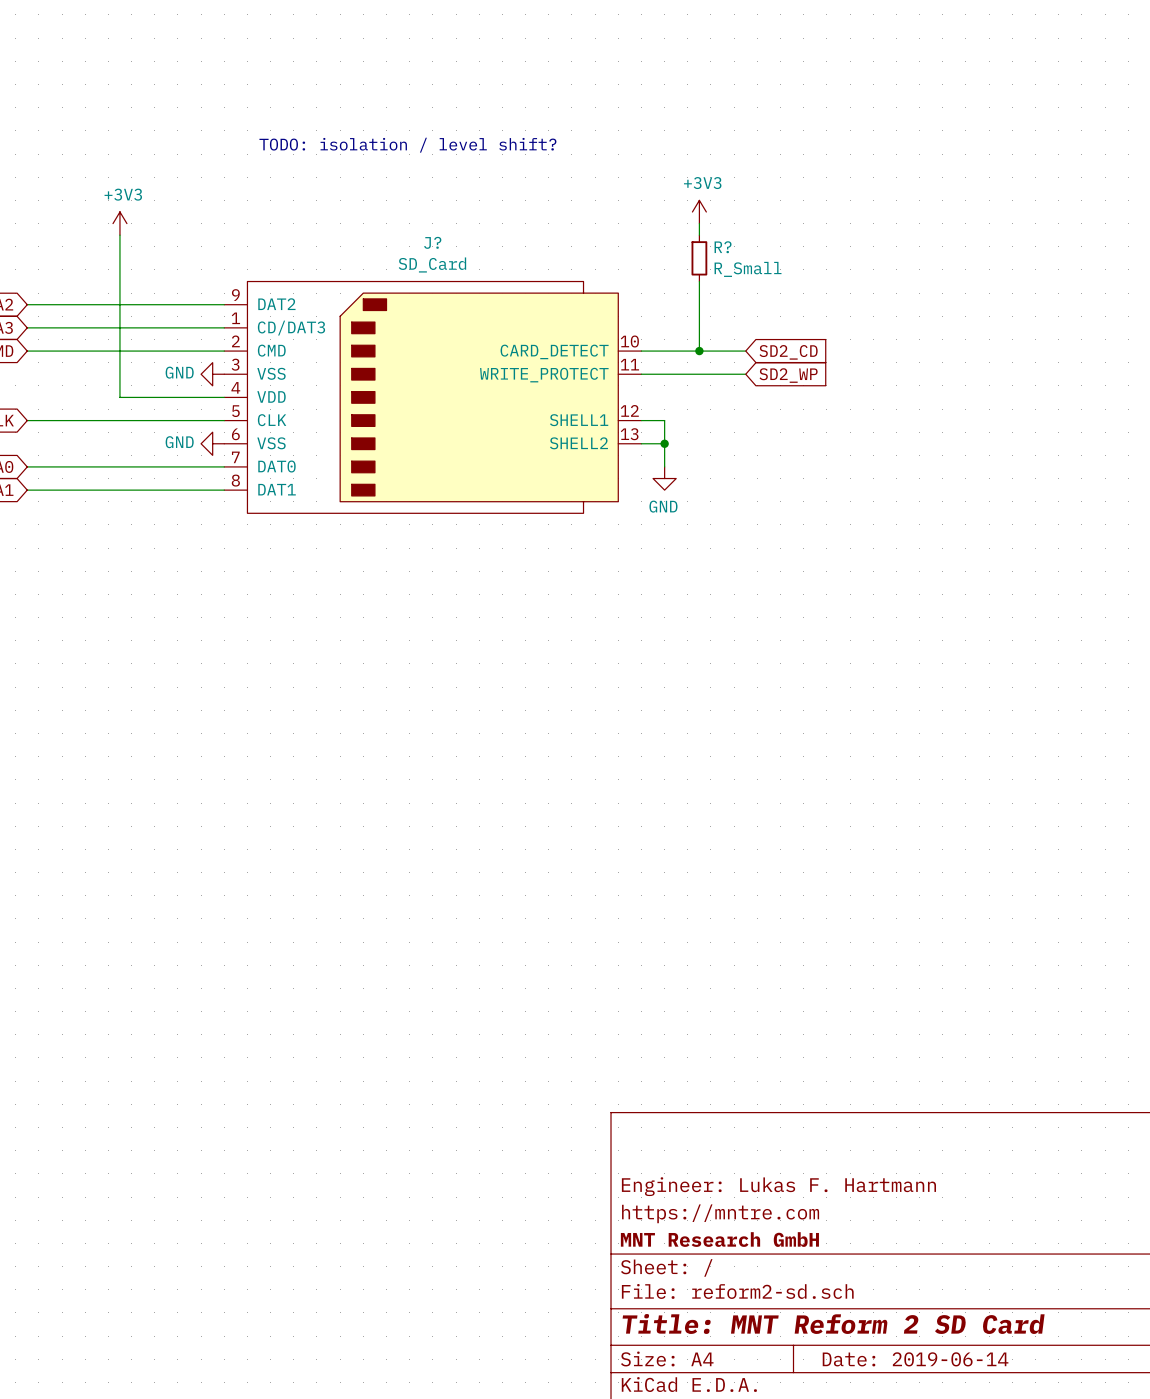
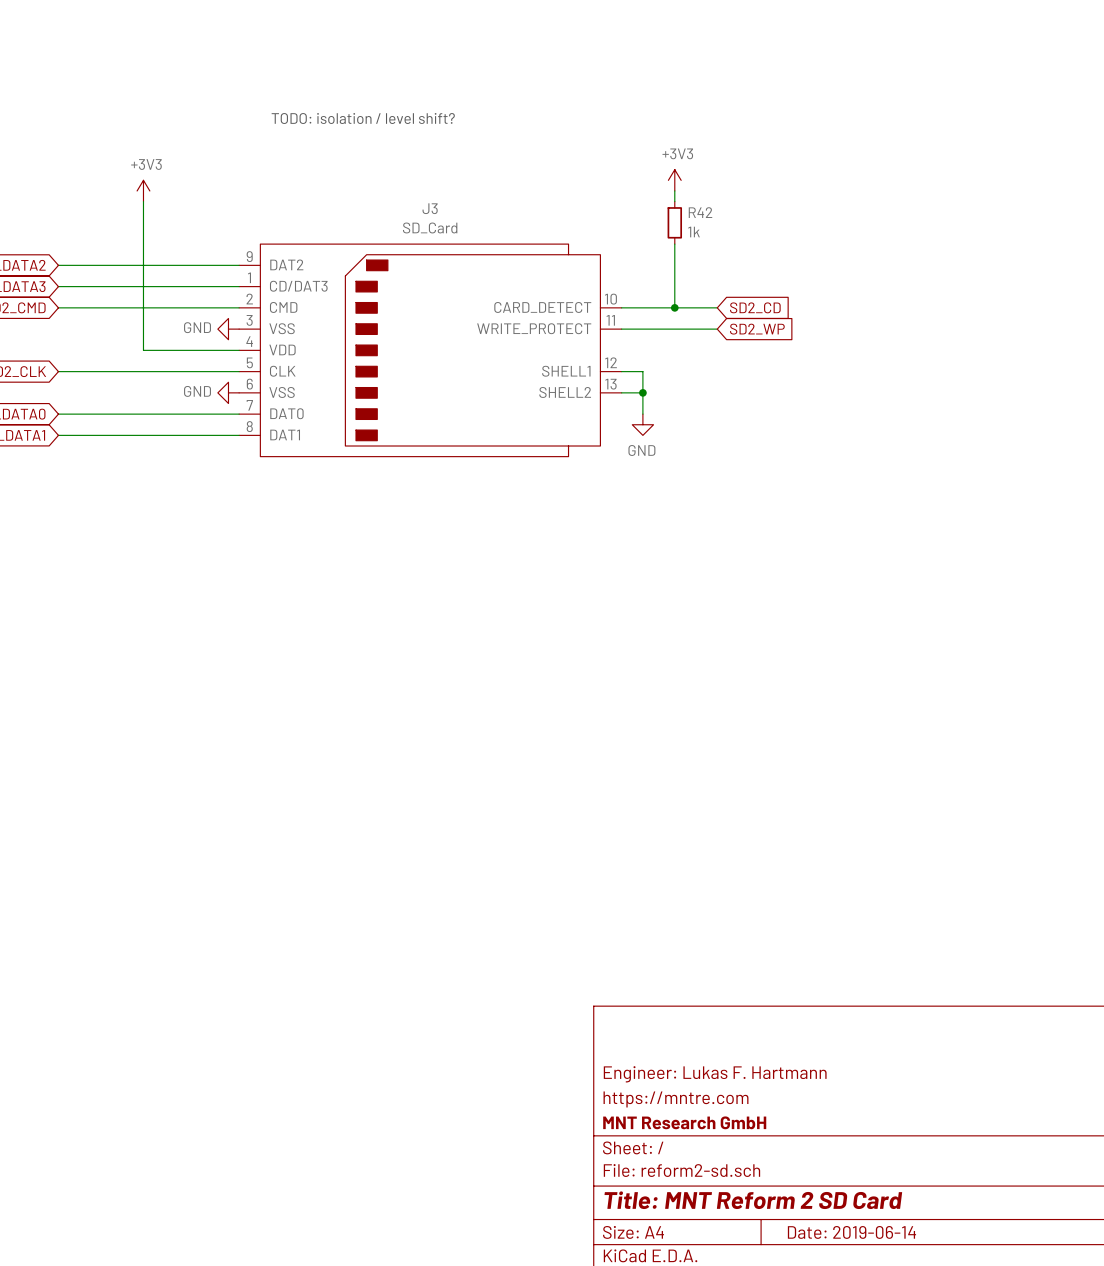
J? name: J? (432, 242) -> J3 (430, 208)
R? name: R? (723, 247) -> R42 (700, 212)
R? value: R_Small (748, 269) -> 1k (694, 232)

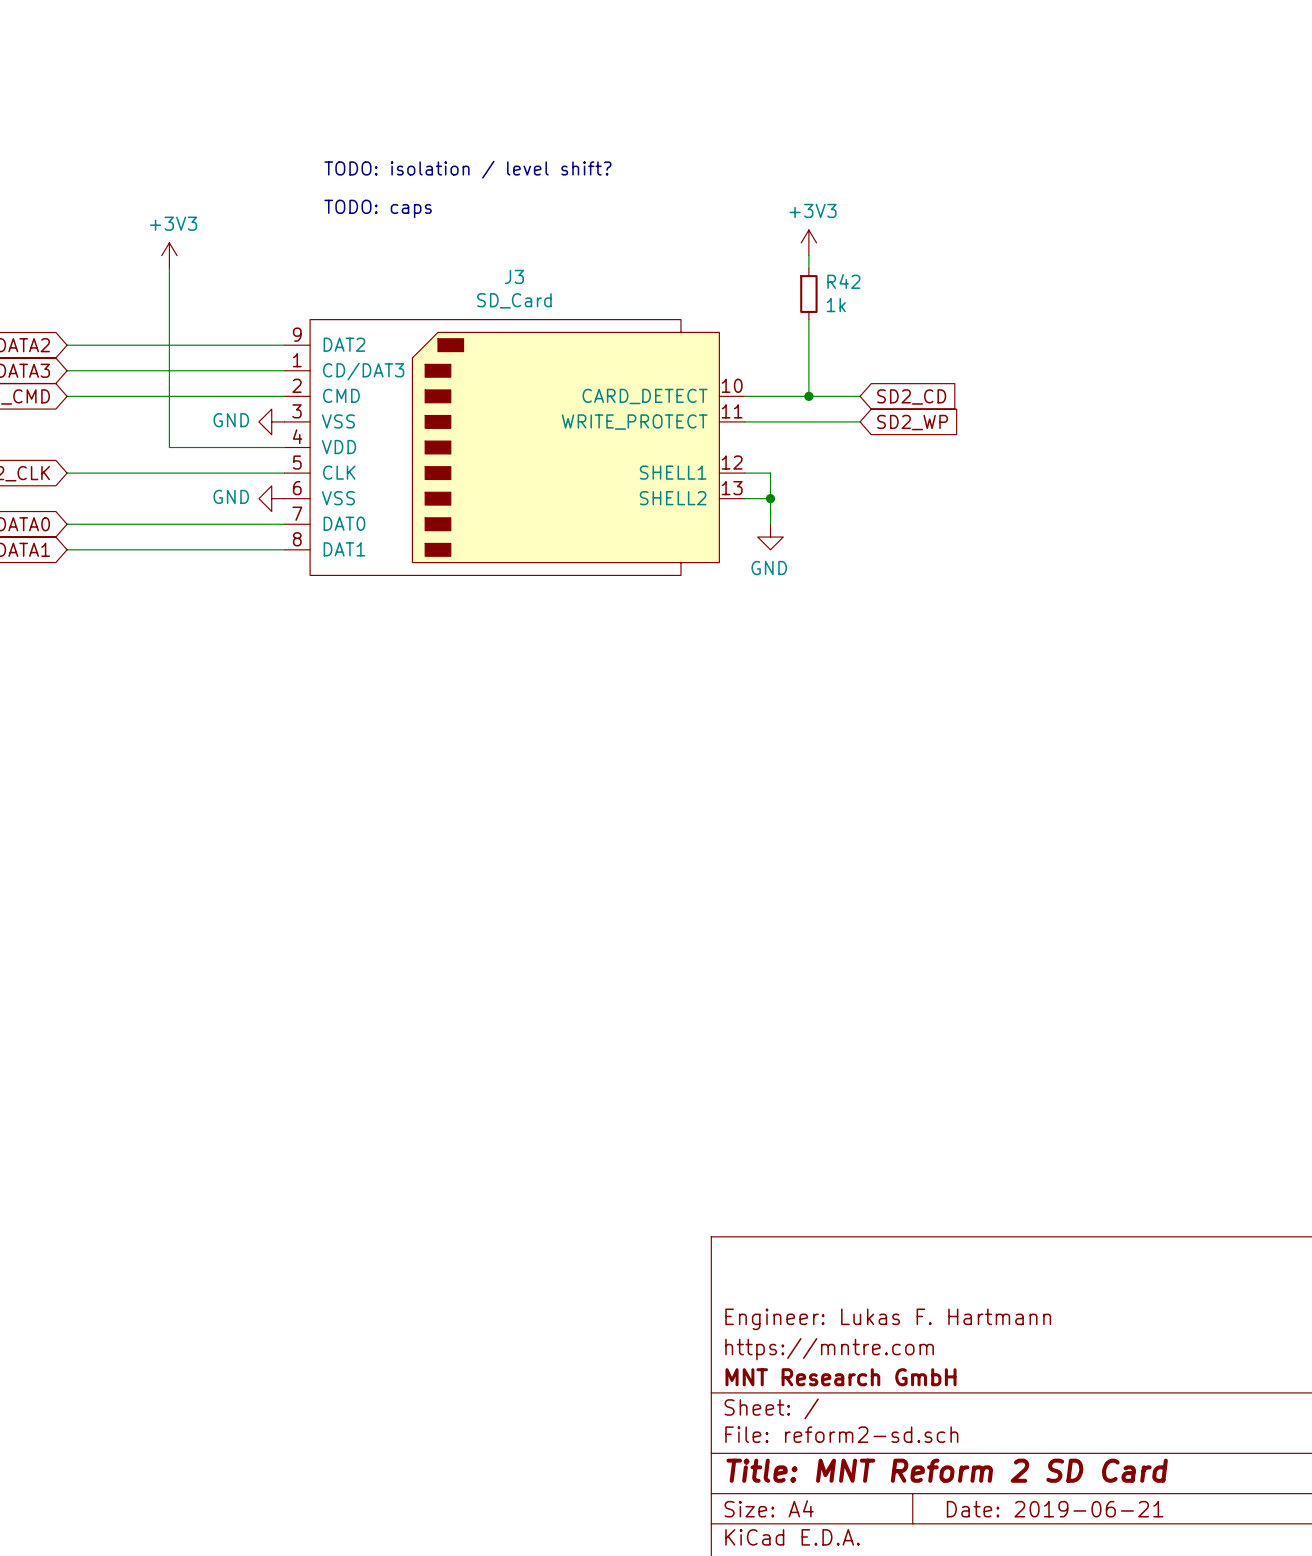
text: none -> TODO: caps (378, 208)
title block: Date: 2019-06-14 (851, 1232) -> Date: 2019-06-21 (1055, 1509)

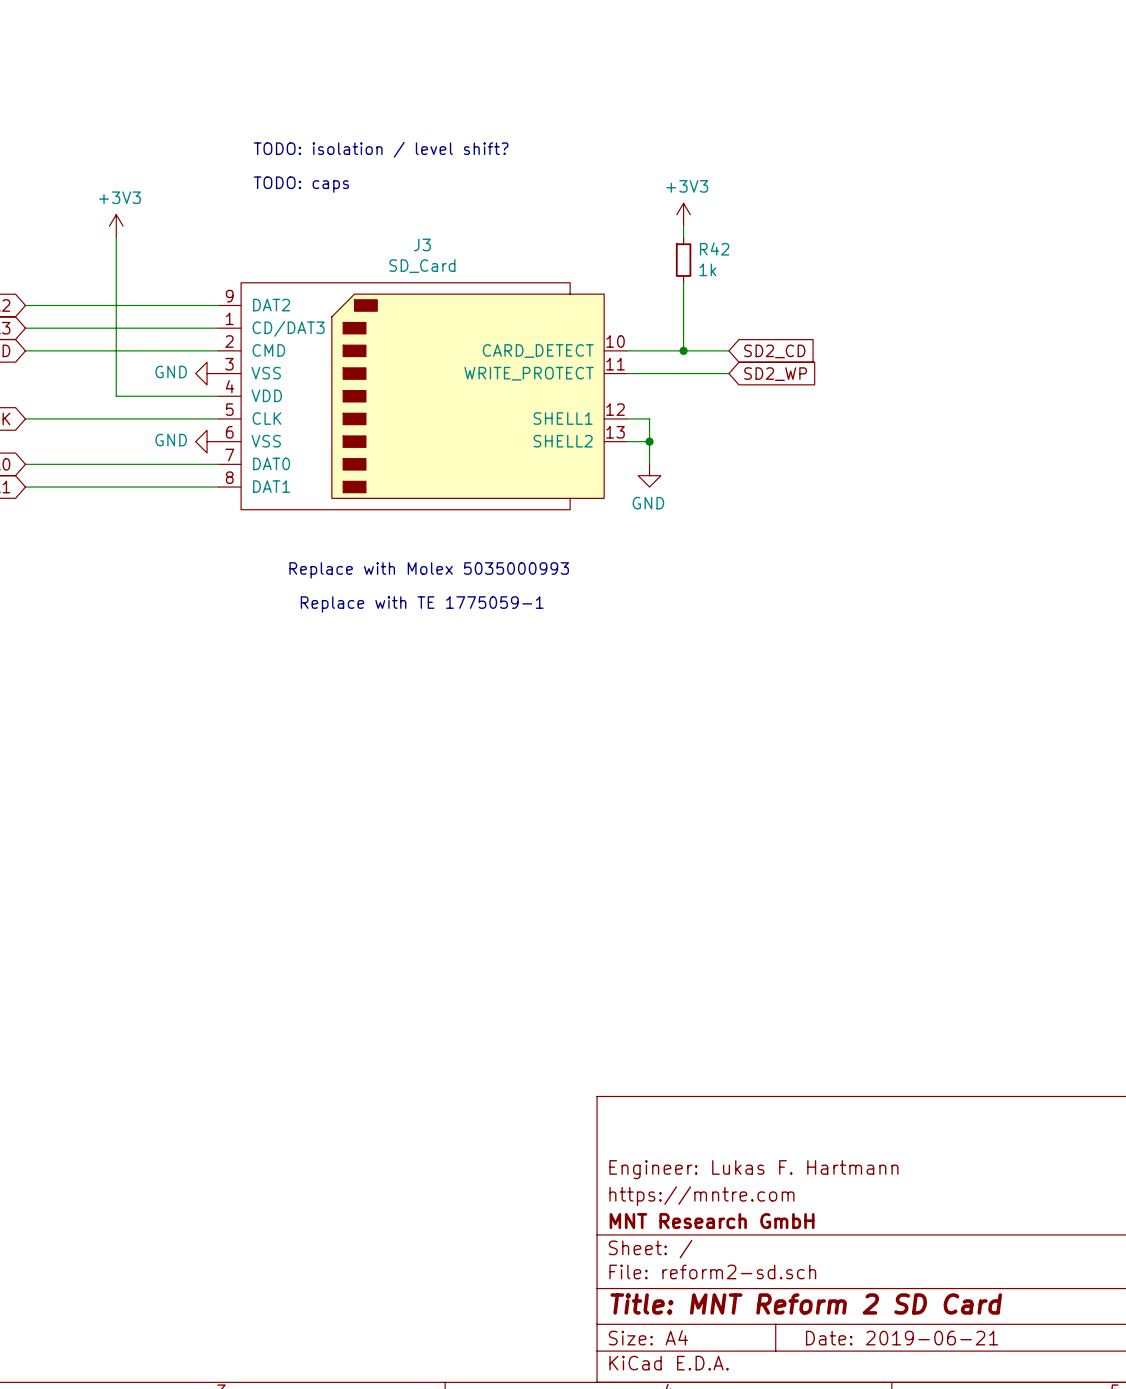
text: none -> Replace with Molex 5035000993 (429, 570)
text: none -> Replace with TE 1775059-1 (422, 604)

